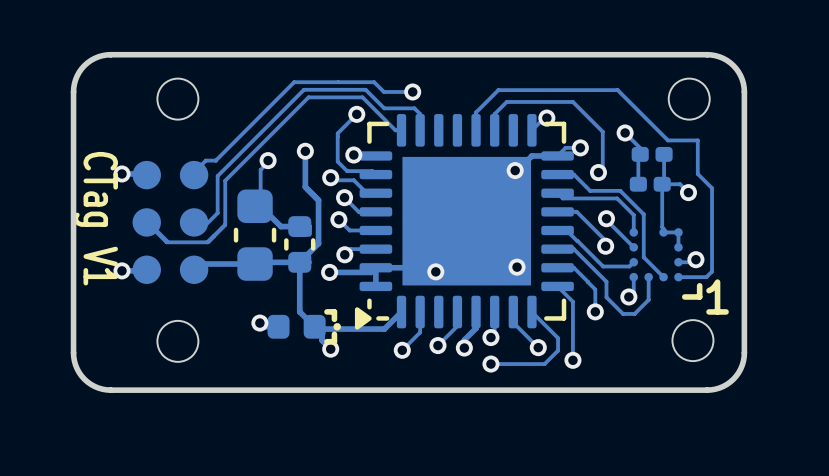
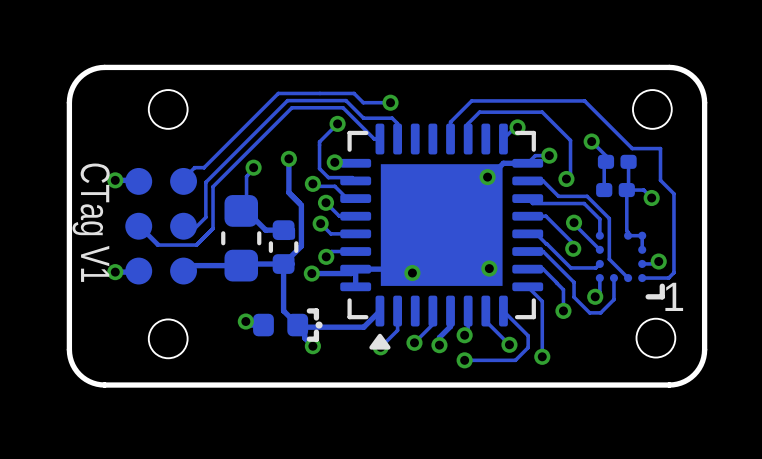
part footprint: [354, 114, 574, 330] -> [340, 123, 544, 350]

